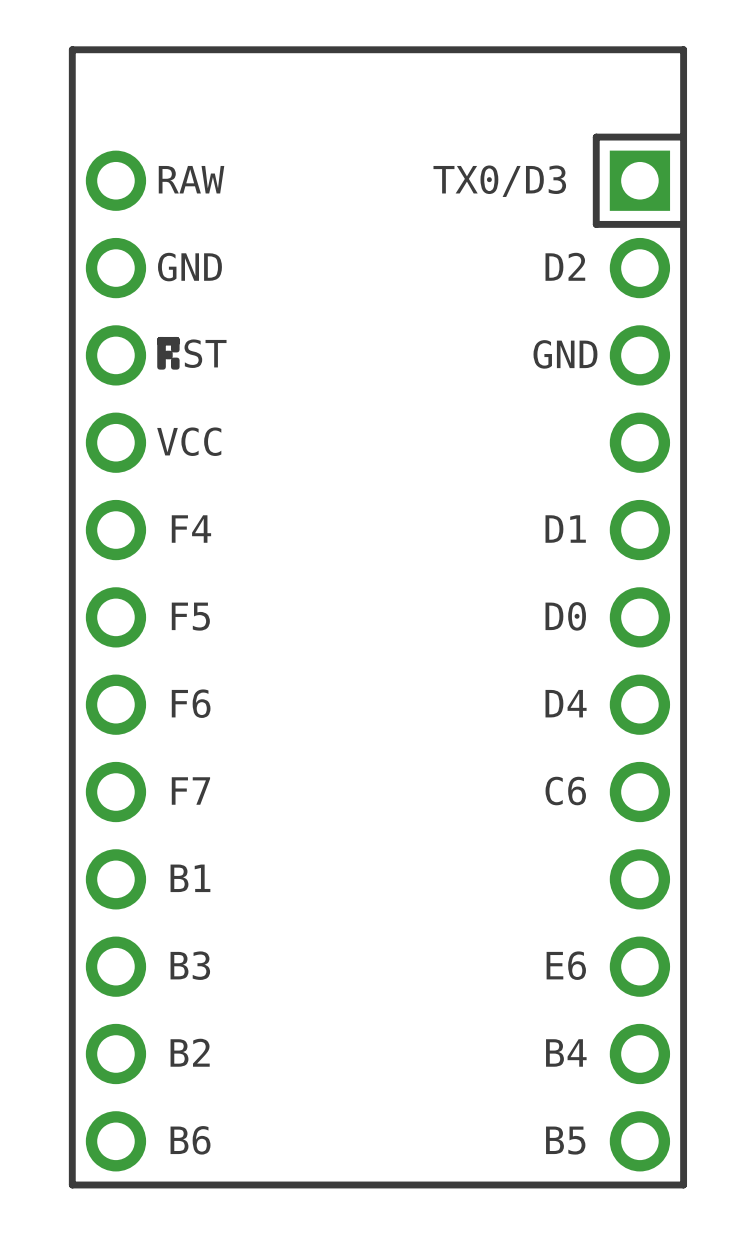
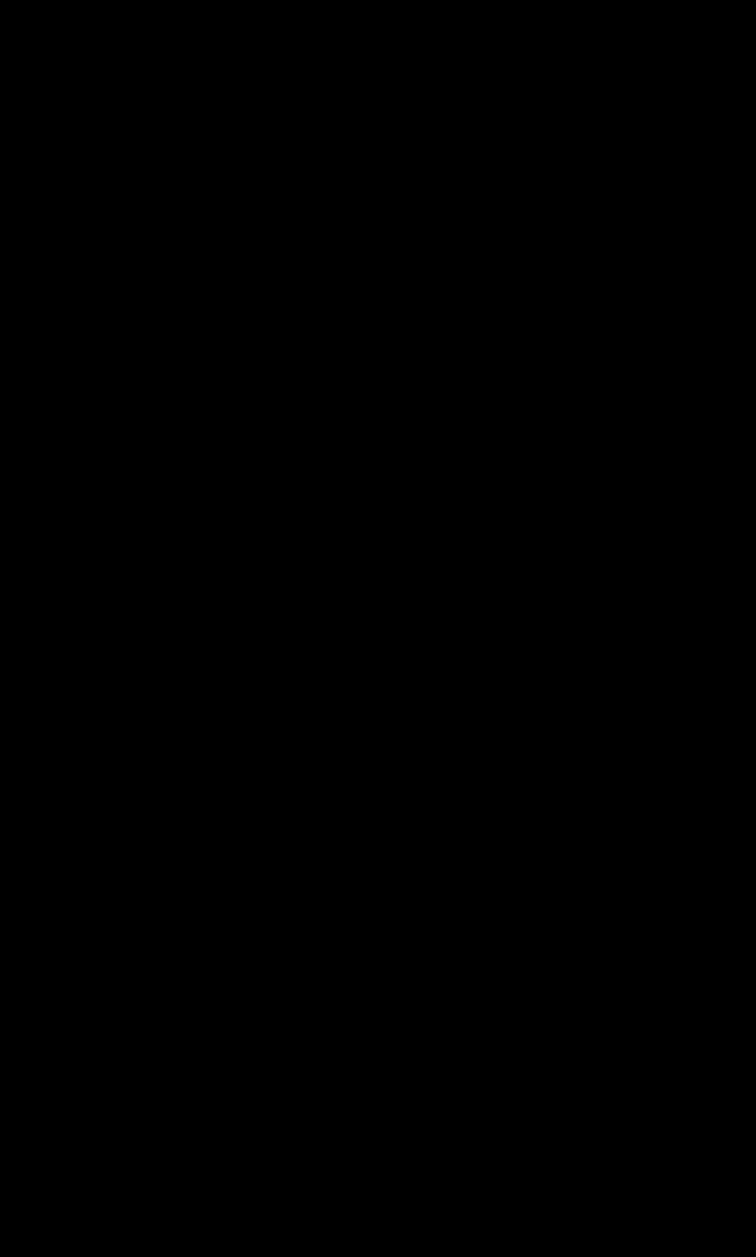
part: (377, 617) -> none

